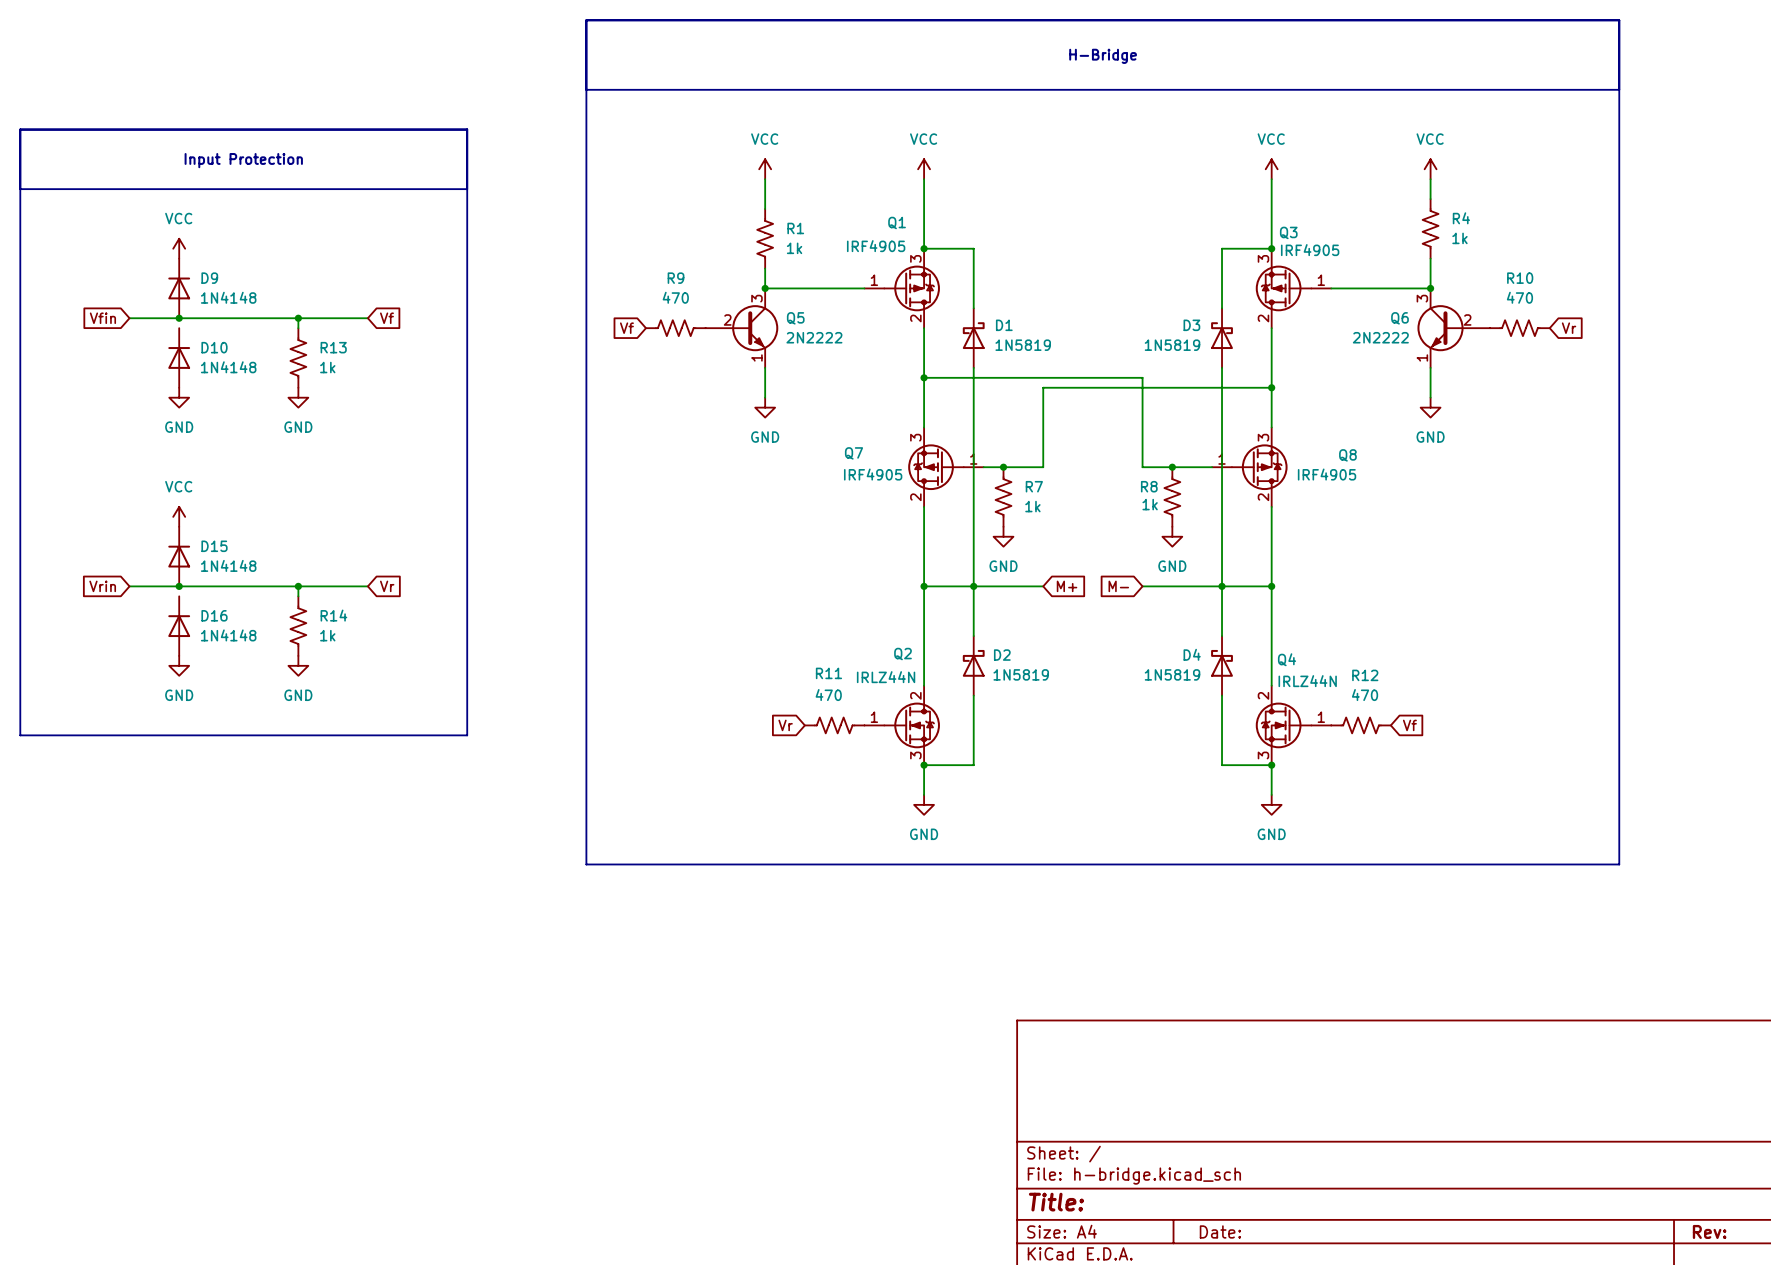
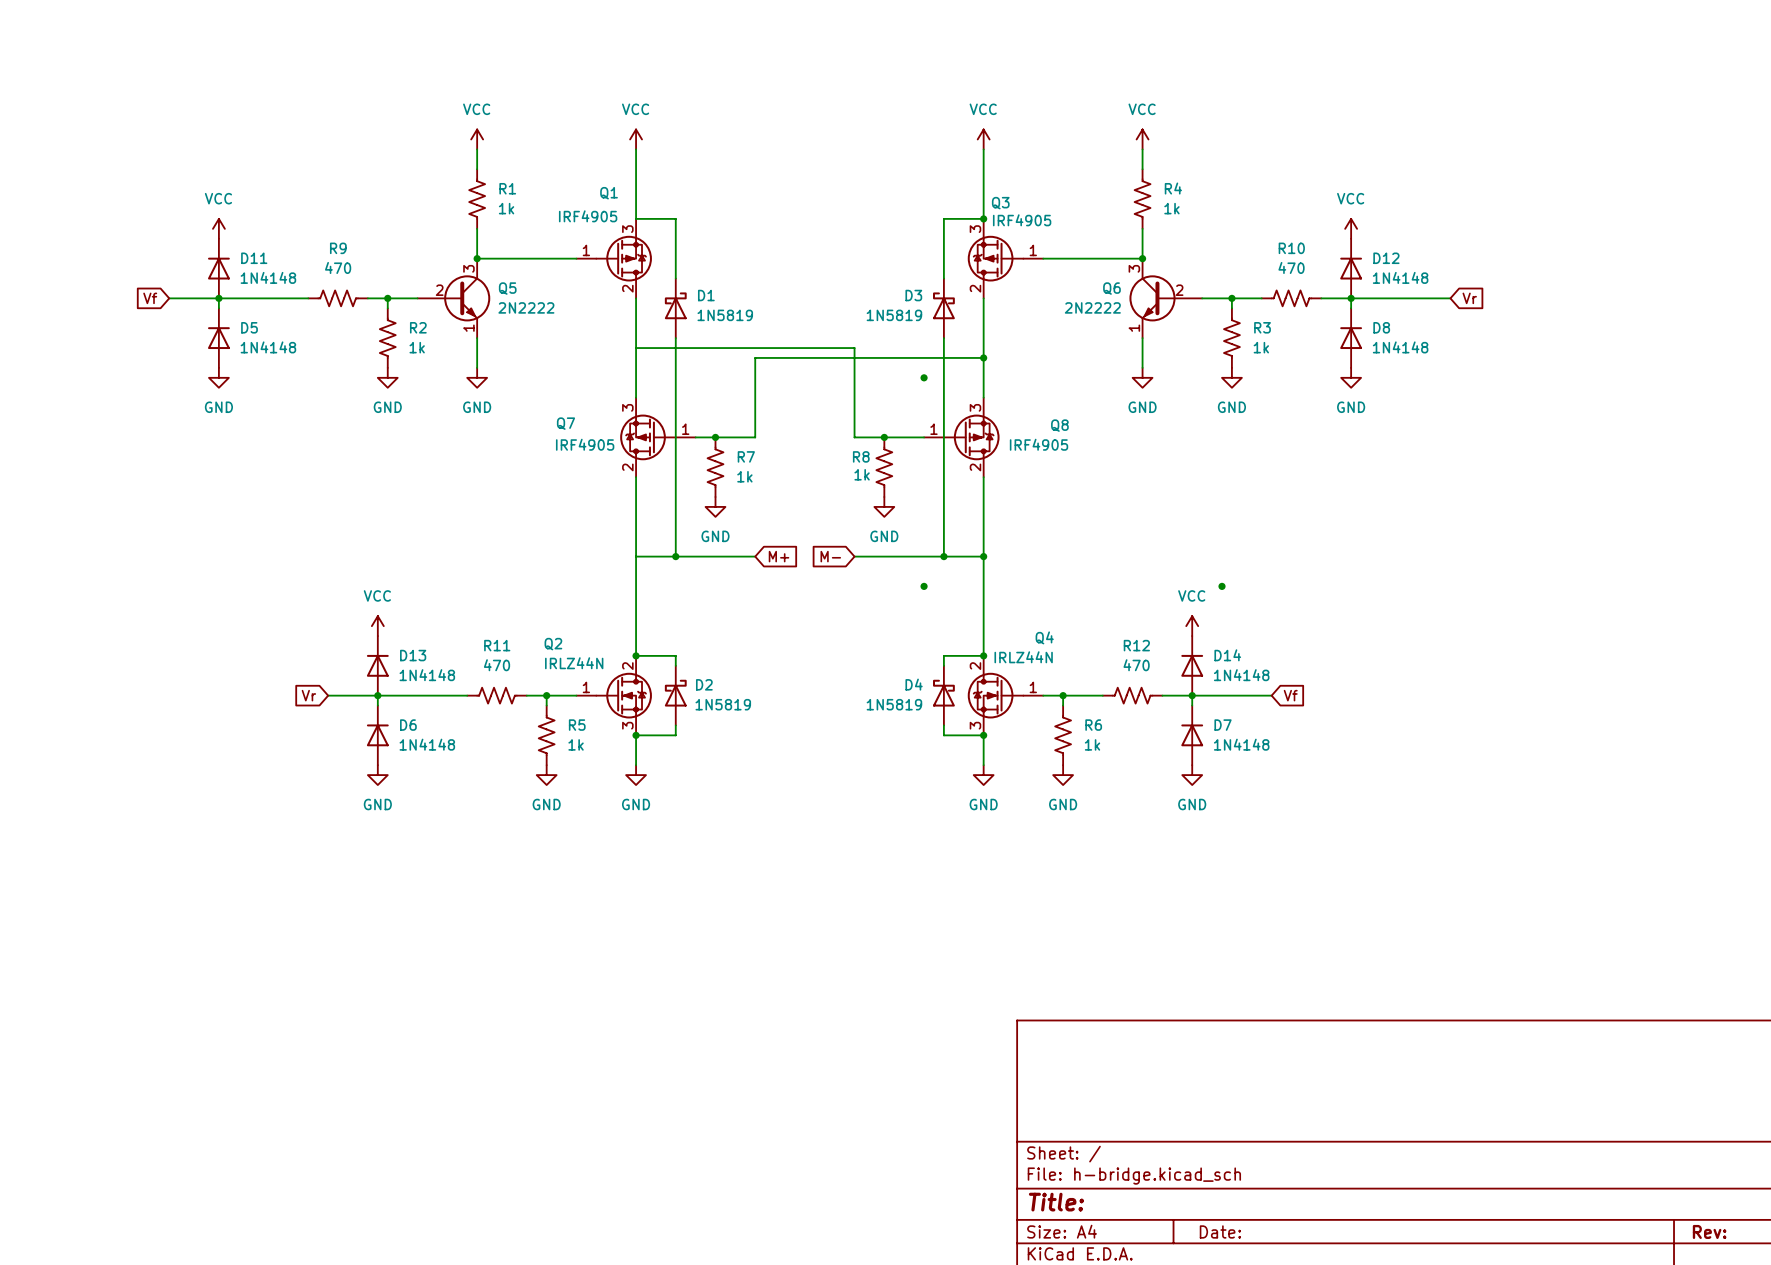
line: (586, 20) (1619, 20) (1619, 864) (586, 864) (586, 20) -> none
text: H-Bridge (1103, 56) -> none
line: (586, 89) (1619, 89) -> none
line: (20, 129) (467, 129) (467, 735) (20, 735) (20, 129) -> none
power symbol: none -> VCC (477, 139)
power symbol: none -> VCC (636, 139)
power symbol: none -> VCC (1142, 139)
wire: none -> (477, 149) (477, 169)
wire: none -> (636, 149) (636, 218) (675, 218) (675, 278)
wire: none -> (983, 149) (983, 218) (943, 218) (943, 278)
wire: none -> (1142, 149) (1142, 169)
text: Input Protection (243, 160) -> none
power symbol: VCC (765, 169) -> none
power symbol position: VCC (924, 169) -> VCC (983, 139)
power symbol: VCC (1271, 169) -> none
power symbol: VCC (1430, 169) -> none
wire: (765, 179) (765, 208) -> none
wire: (924, 179) (924, 248) (973, 248) (973, 308) -> none
wire: (1271, 179) (1271, 248) (1222, 248) (1222, 308) -> none
wire: (1430, 179) (1430, 199) -> none
line: (20, 189) (467, 189) -> none
junction: none -> (983, 218)
wire: none -> (477, 228) (477, 258) (576, 258)
wire: none -> (1142, 228) (1142, 258) (1043, 258)
power symbol: none -> VCC (1351, 228)
R4 position: (1430, 228) -> (1142, 199)
R1 position: (765, 238) -> (477, 199)
power symbol position: VCC (179, 248) -> VCC (218, 228)
junction: (924, 248) -> none
junction: (1271, 248) -> none
junction: none -> (477, 258)
junction: none -> (1142, 258)
wire: (1430, 258) (1430, 288) (1331, 288) -> none
D11: none -> 1N4148 (218, 268)
wire: (765, 268) (765, 288) (864, 288) -> none
D12: none -> 1N4148 (1351, 268)
D9: 1N4148 (179, 288) -> none
junction: (765, 288) -> none
Q1 position: (902, 288) -> (614, 258)
Q3 position: (1293, 288) -> (1005, 258)
junction: (1430, 288) -> none
wire: none -> (169, 298) (308, 298)
junction: none -> (218, 298)
wire: none -> (367, 298) (417, 298)
wire: none -> (387, 298) (387, 308)
junction: none -> (387, 298)
wire: none -> (636, 298) (636, 397)
wire: none -> (1202, 298) (1261, 298)
wire: none -> (1231, 298) (1231, 308)
junction: none -> (1231, 298)
wire: none -> (1321, 298) (1450, 298)
wire: none -> (1351, 298) (1351, 308)
junction: none -> (1351, 298)
global label: Vfin (102, 318) -> Vf (150, 298)
wire: (129, 318) (367, 318) -> none
junction: (179, 318) -> none
wire: (298, 318) (298, 328) -> (218, 298) (218, 308)
junction: (298, 318) -> none
global label: Vf (386, 318) -> none
global label: Vf (626, 328) -> none
R9 position: (675, 328) -> (338, 298)
Q5 position: (741, 328) -> (453, 298)
wire: (924, 328) (924, 427) -> (983, 298) (983, 397)
wire: (1271, 328) (1271, 427) -> none
Q6 position: (1453, 328) -> (1165, 298)
R10 position: (1519, 328) -> (1291, 298)
global label position: Vr (1569, 328) -> Vr (1469, 298)
D5: none -> 1N4148 (218, 338)
R2: none -> 1k (387, 338)
wire: none -> (477, 338) (477, 367)
wire: none -> (675, 338) (675, 556)
wire: none -> (943, 338) (943, 556)
D1 position: (973, 338) -> (675, 308)
wire: none -> (1142, 338) (1142, 367)
D3 position: (1222, 338) -> (943, 308)
R3: none -> 1k (1231, 338)
D8: none -> 1N4148 (1351, 338)
wire: none -> (636, 348) (854, 348) (854, 437) (924, 437)
D10: 1N4148 (179, 357) -> none
R13: 1k (298, 357) -> none
wire: none -> (983, 357) (755, 357) (755, 437) (695, 437)
junction: none -> (983, 357)
wire: (765, 367) (765, 397) -> none
wire: (973, 367) (973, 636) -> none
wire: (1222, 367) (1222, 636) -> none
wire: (1430, 367) (1430, 397) -> none
power symbol: none -> GND (218, 377)
power symbol: none -> GND (387, 377)
power symbol: none -> GND (477, 377)
wire: (924, 377) (1142, 377) (1142, 467) (1212, 467) -> none
power symbol: none -> GND (1142, 377)
power symbol: none -> GND (1231, 377)
wire: (1271, 387) (1043, 387) (1043, 467) (983, 467) -> none
junction: (1271, 387) -> none
power symbol: GND (179, 397) -> none
power symbol: GND (298, 397) -> none
power symbol: GND (765, 407) -> none
power symbol position: GND (1430, 407) -> GND (1351, 377)
junction: none -> (715, 437)
junction: none -> (884, 437)
Q7 position: (945, 467) -> (657, 437)
junction: (1003, 467) -> none
junction: (1172, 467) -> none
Q8 position: (1249, 467) -> (961, 437)
wire: none -> (636, 477) (636, 655) (675, 655) (675, 665)
wire: none -> (983, 477) (983, 655) (943, 655) (943, 665)
R7 position: (1003, 497) -> (715, 467)
R8 position: (1172, 497) -> (884, 467)
power symbol: none -> GND (715, 506)
power symbol: none -> GND (884, 506)
wire: (924, 506) (924, 685) -> none
wire: (1271, 506) (1271, 685) -> none
power symbol: VCC (179, 516) -> none
power symbol: GND (1003, 536) -> none
power symbol: GND (1172, 536) -> none
D15: 1N4148 (179, 556) -> none
wire: none -> (636, 556) (755, 556)
junction: none -> (675, 556)
global label: none -> M+ (779, 556)
global label: none -> M- (830, 556)
wire: none -> (854, 556) (983, 556)
junction: none -> (943, 556)
junction: none -> (983, 556)
global label: Vrin (102, 586) -> none
wire: (129, 586) (367, 586) -> none
junction: (179, 586) -> none
wire: (298, 586) (298, 596) -> (377, 695) (377, 705)
junction: (298, 586) -> none
global label rotation: 0° (387, 586) -> 180° (308, 695)
global label position: Vr (387, 586) -> Vr (308, 695)
wire: (924, 586) (1043, 586) -> none
junction: (973, 586) -> none
global label: M+ (1067, 586) -> none
global label: M- (1118, 586) -> none
wire: (1142, 586) (1271, 586) -> none
junction: (1271, 586) -> none
D16: 1N4148 (179, 626) -> none
R14: 1k (298, 626) -> none
power symbol: none -> VCC (377, 626)
power symbol: none -> VCC (1192, 626)
Q2 name position: Q2 (903, 654) -> Q2 (553, 644)
junction: none -> (636, 655)
junction: none -> (983, 655)
Q4 name position: Q4 (1287, 659) -> Q4 (1044, 637)
power symbol: GND (179, 665) -> none
power symbol: GND (298, 665) -> none
D13: none -> 1N4148 (377, 665)
D2 position: (973, 665) -> (675, 695)
D14: none -> 1N4148 (1192, 665)
D4 position: (1222, 665) -> (943, 695)
R11 name position: R11 (828, 673) -> R11 (497, 645)
Q2 value position: IRLZ44N (886, 677) -> IRLZ44N (574, 663)
Q4 value position: IRLZ44N (1307, 681) -> IRLZ44N (1023, 657)
wire: none -> (328, 695) (467, 695)
junction: none -> (377, 695)
wire: none -> (526, 695) (576, 695)
wire: none -> (546, 695) (546, 705)
junction: none -> (546, 695)
R11 value position: 470 (828, 695) -> 470 (497, 665)
wire: (973, 695) (973, 765) (924, 765) (924, 794) -> none
wire: none -> (1043, 695) (1102, 695)
wire: none -> (1063, 695) (1063, 705)
junction: none -> (1063, 695)
wire: none -> (1162, 695) (1271, 695)
wire: none -> (1192, 695) (1192, 705)
junction: none -> (1192, 695)
wire: (1222, 695) (1222, 765) (1271, 765) (1271, 794) -> none
wire: none -> (675, 725) (675, 735) (636, 735) (636, 765)
global label: Vr (785, 725) -> none
R11 position: (834, 725) -> (497, 695)
Q2 position: (902, 725) -> (614, 695)
wire: none -> (943, 725) (943, 735) (983, 735) (983, 765)
Q4 position: (1293, 725) -> (1005, 695)
R12 position: (1361, 725) -> (1132, 695)
global label position: Vf (1409, 725) -> Vf (1290, 695)
D6: none -> 1N4148 (377, 735)
R5: none -> 1k (546, 735)
junction: none -> (636, 735)
junction: none -> (983, 735)
R6: none -> 1k (1063, 735)
D7: none -> 1N4148 (1192, 735)
junction: (924, 765) -> none
junction: (1271, 765) -> none
power symbol: none -> GND (377, 775)
power symbol: none -> GND (546, 775)
power symbol: none -> GND (636, 775)
power symbol: none -> GND (1063, 775)
power symbol position: GND (924, 804) -> GND (983, 775)
power symbol position: GND (1271, 804) -> GND (1192, 775)

